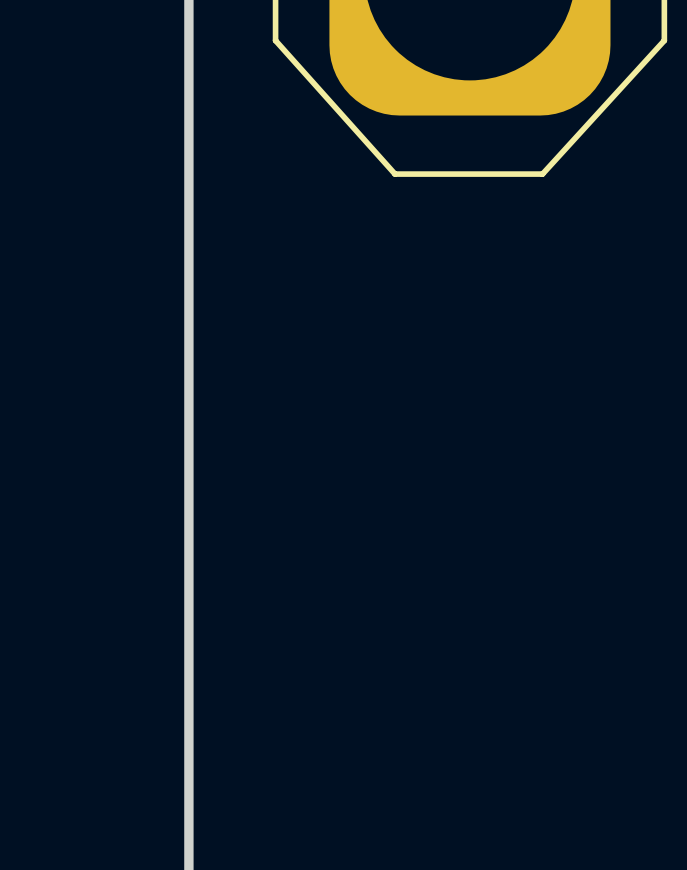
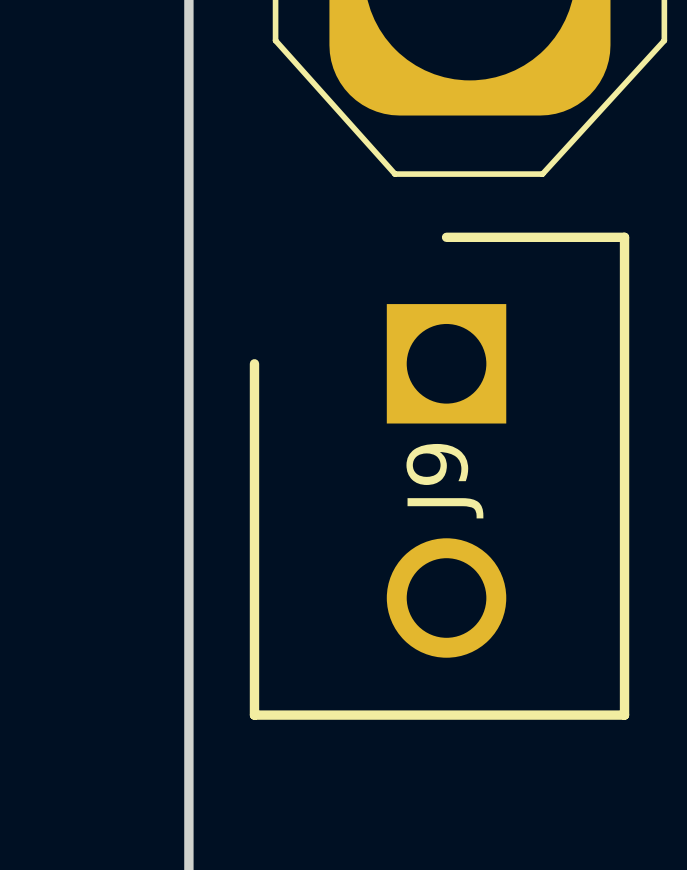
J9: none -> (439, 476)

